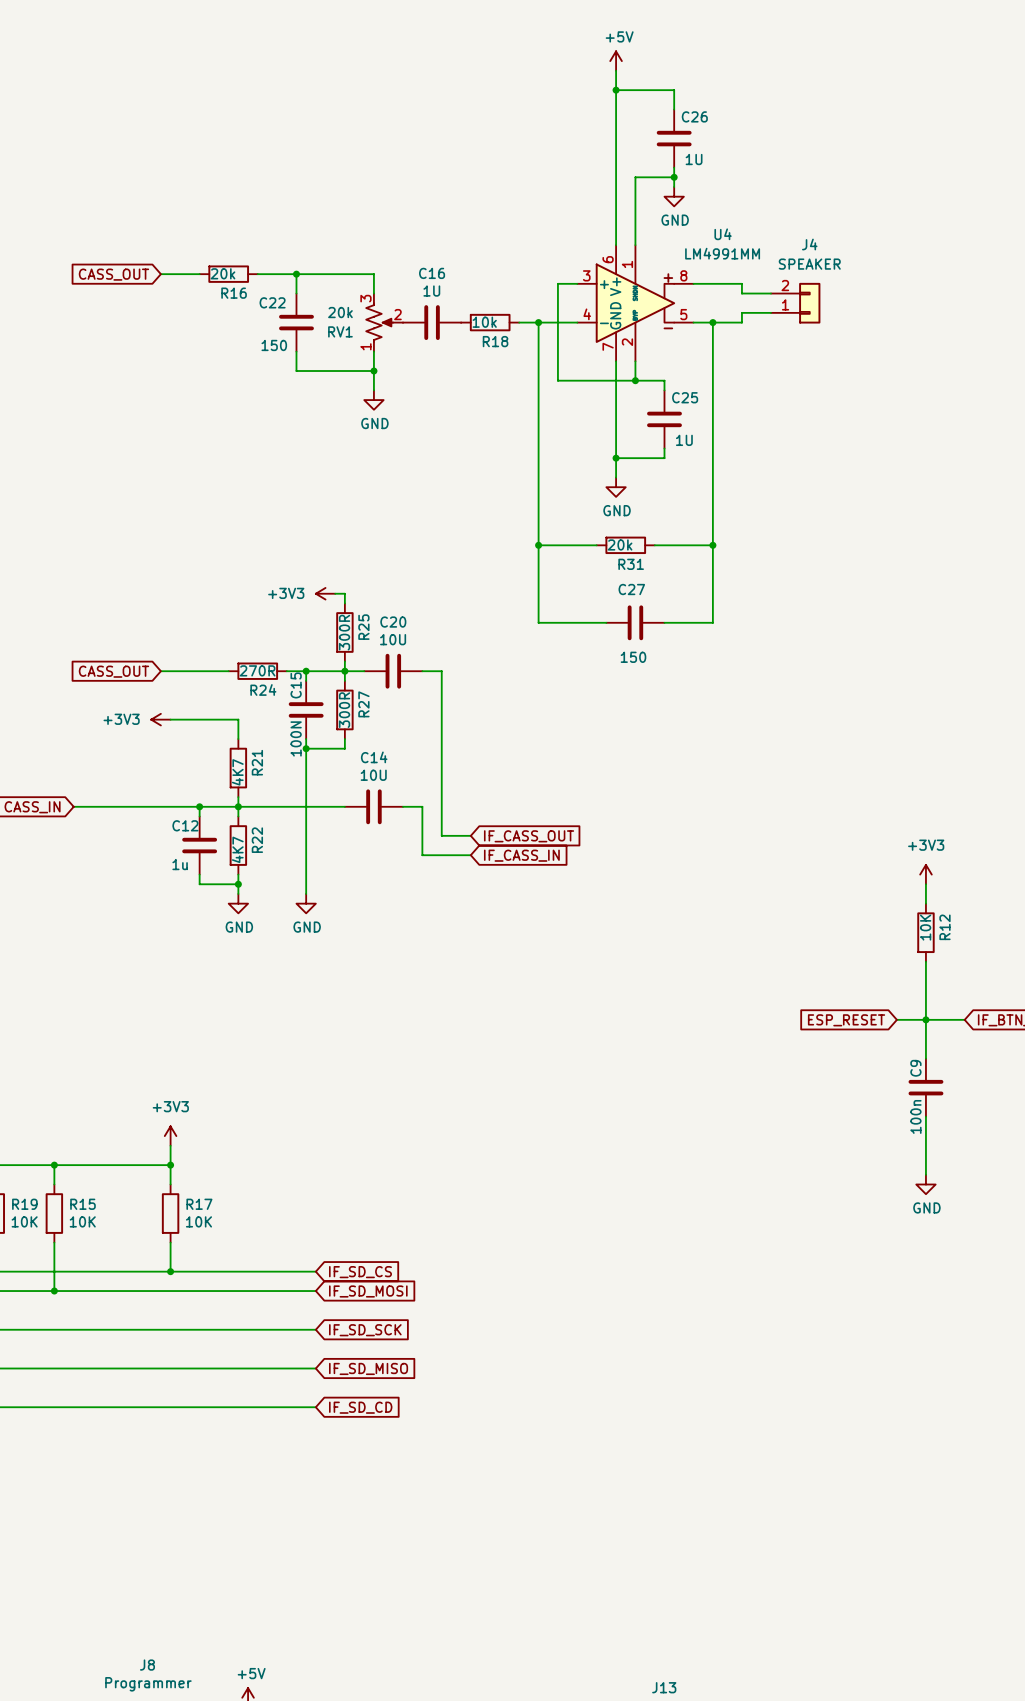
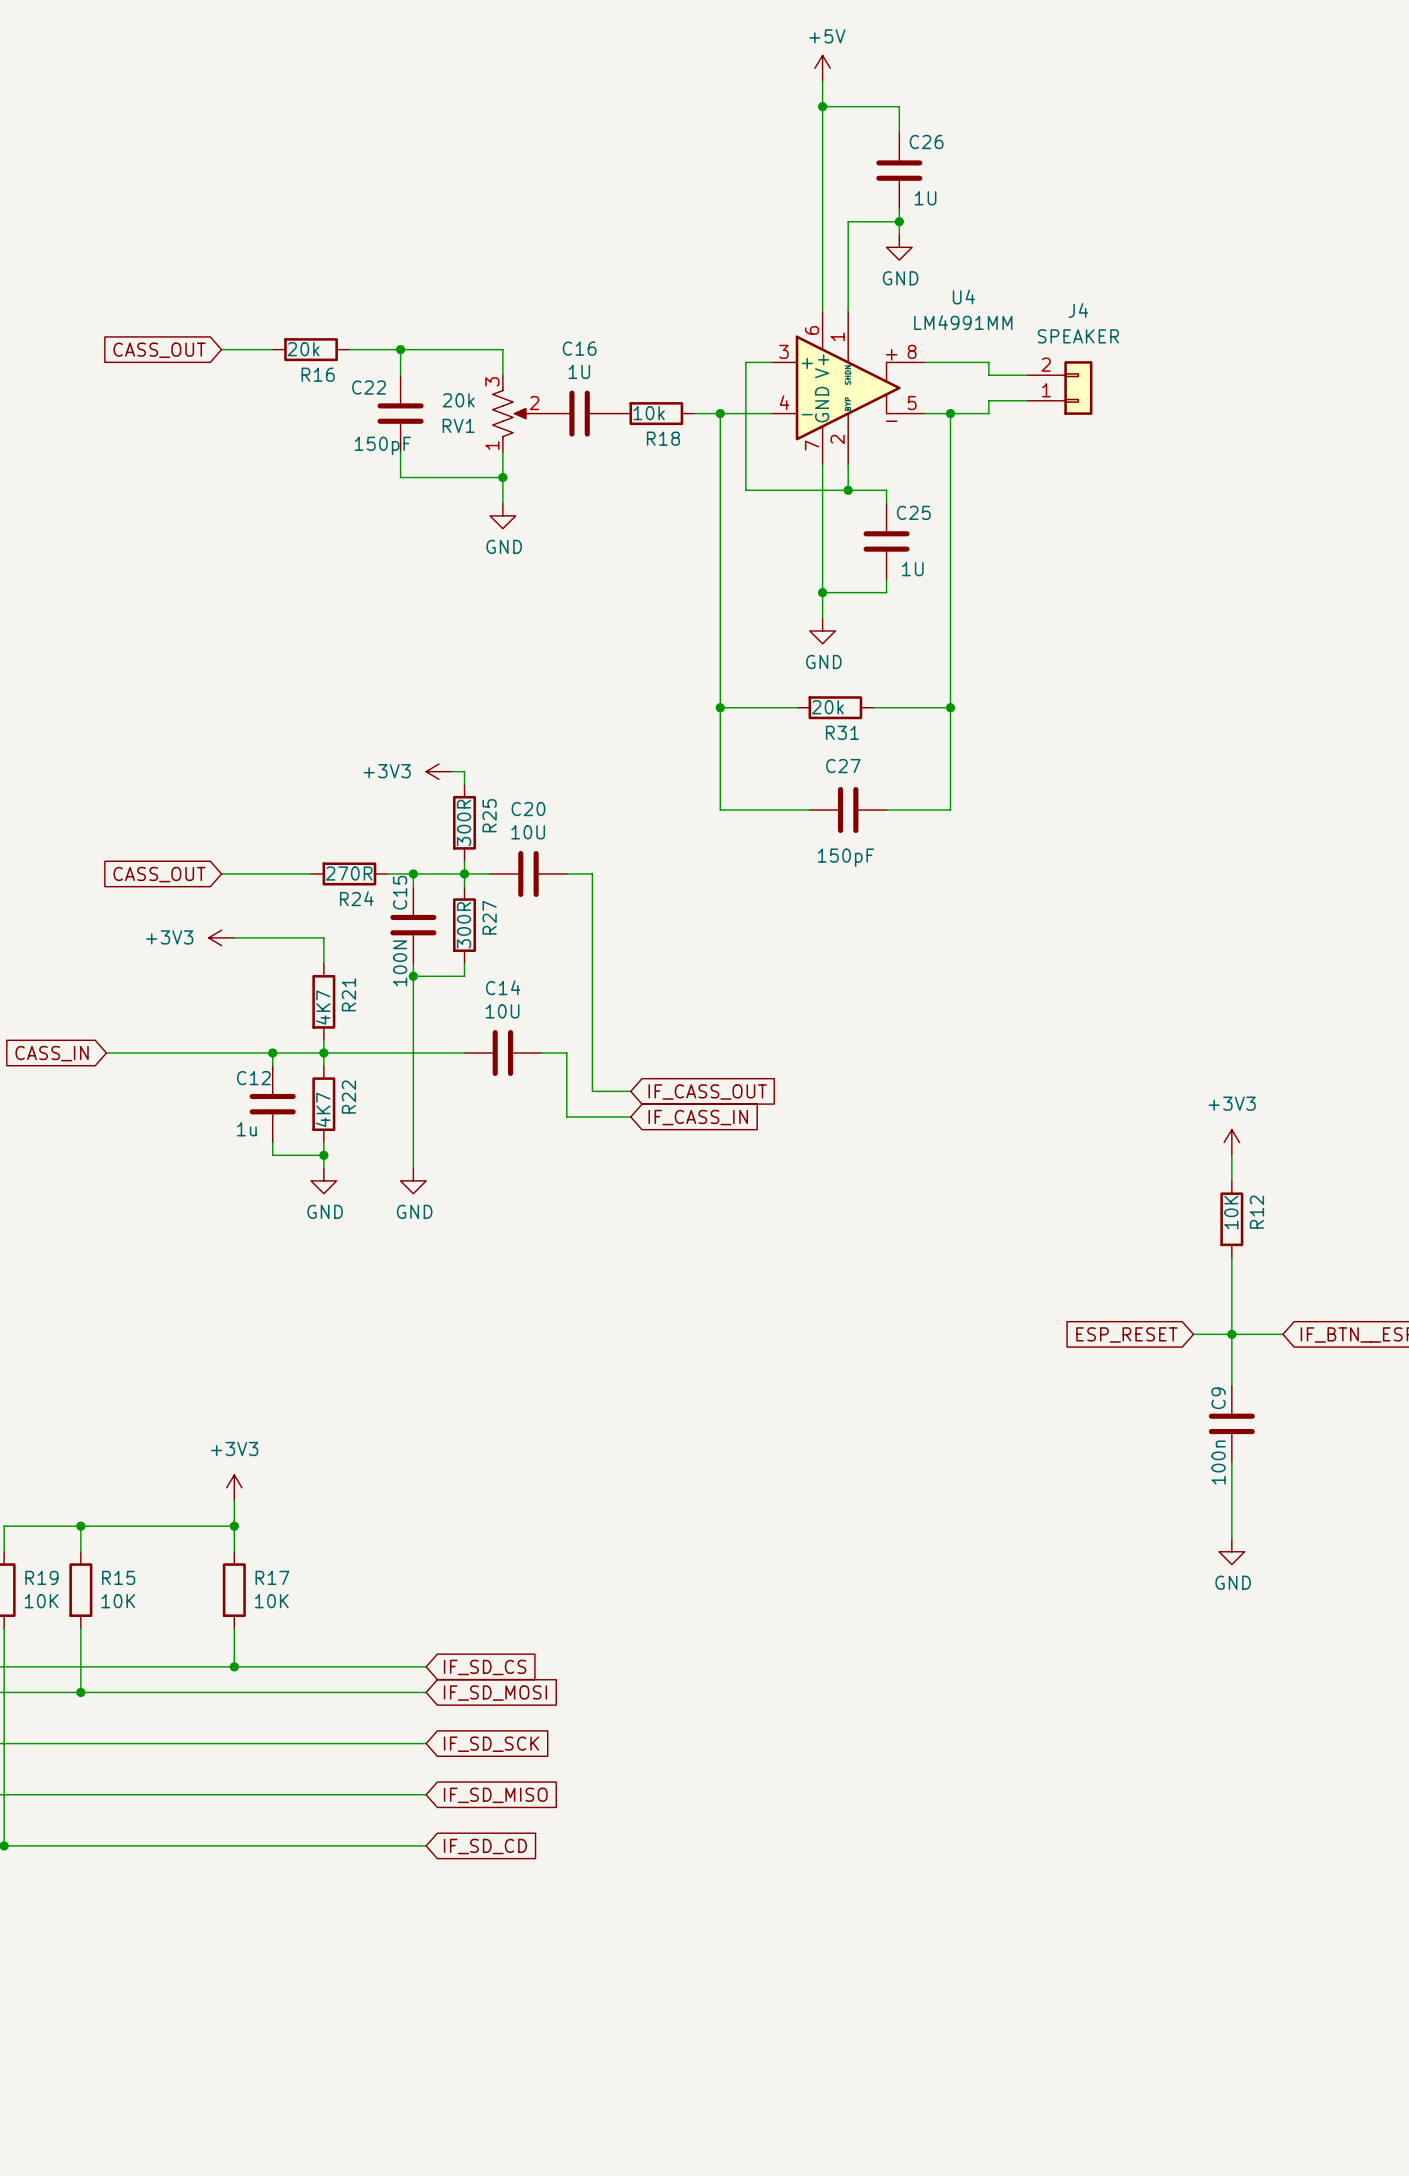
C22 value: 150 (274, 345) -> 150pF (382, 445)
C27 value: 150 (633, 657) -> 150pF (845, 857)

